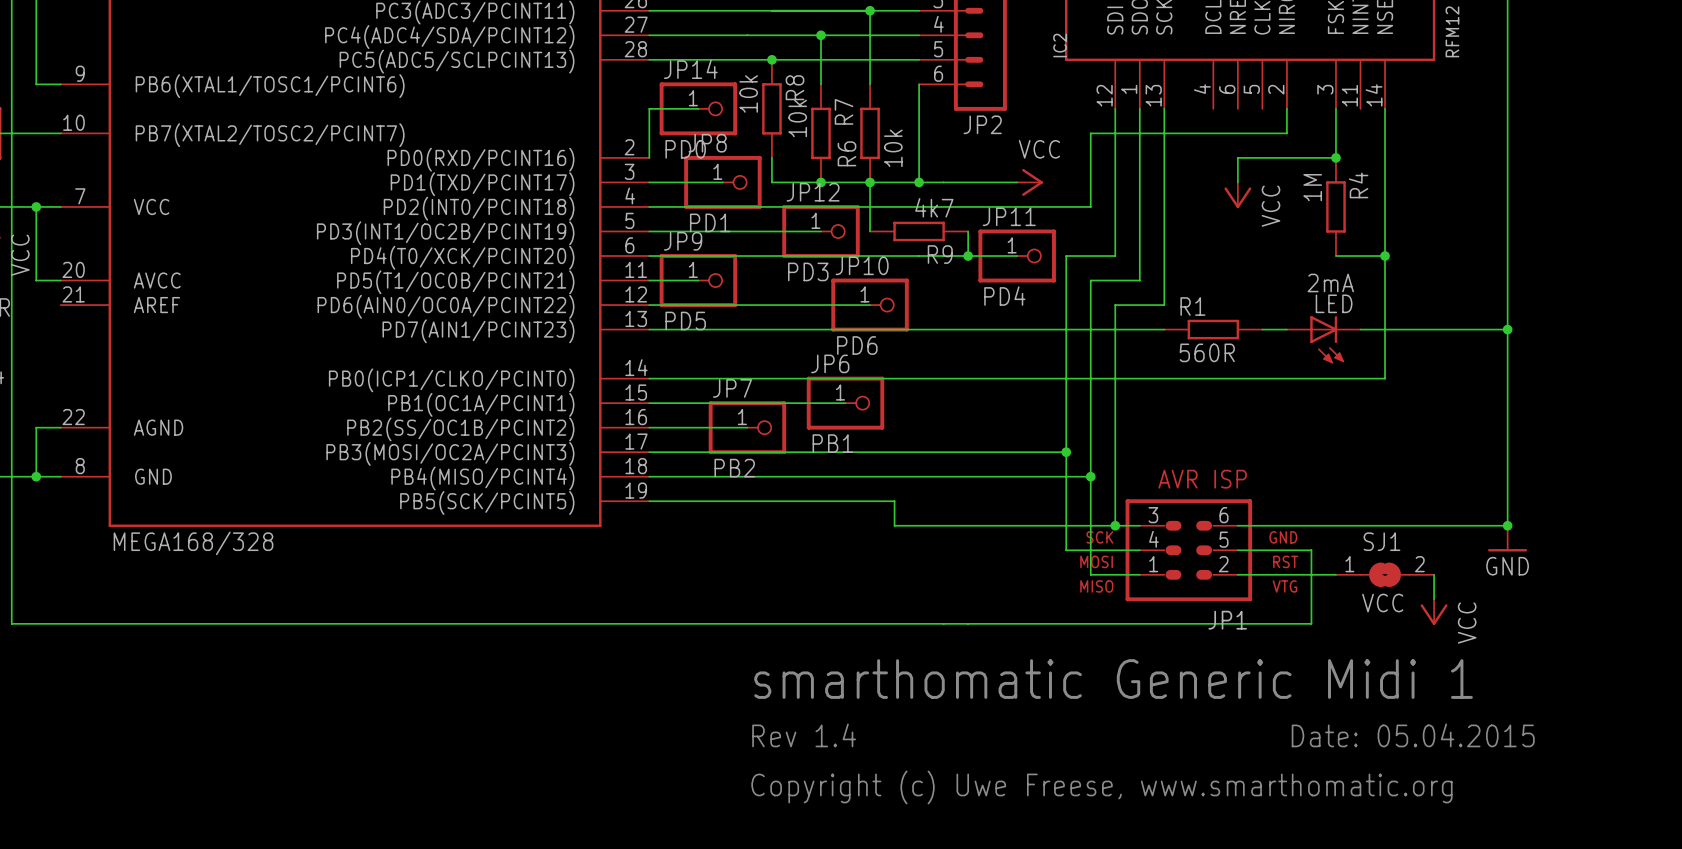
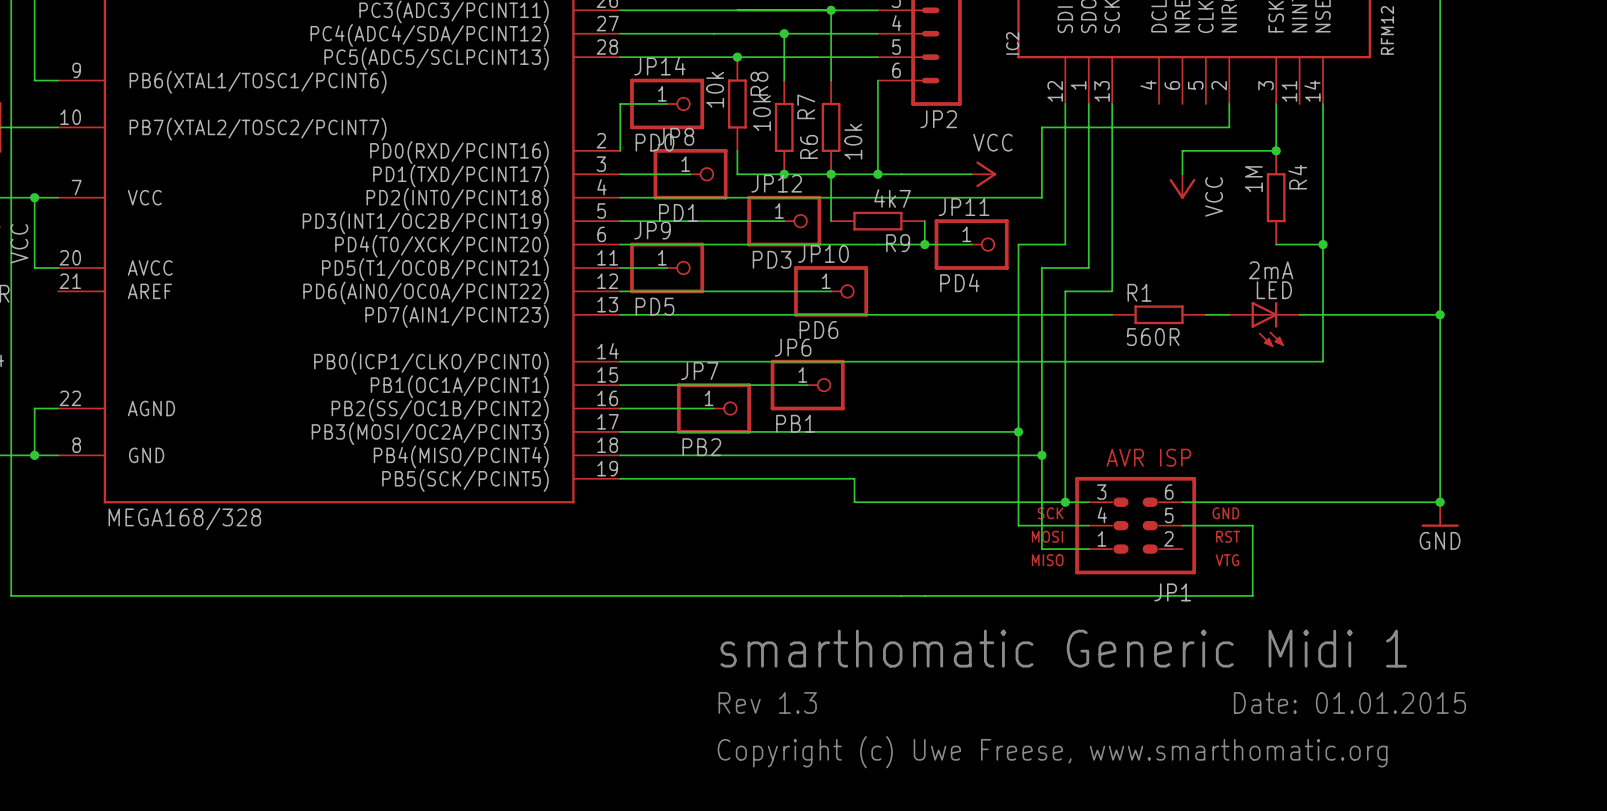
wire: (1237, 574) (1335, 574) -> none
SJ1: VCC (1385, 574) -> none
wire: (1434, 574) (1434, 599) -> none
power symbol: VCC (1434, 612) -> none
text: Rev 1.4 (804, 735) -> Rev 1.3 (767, 702)
text: Date: 05.04.2015 (1413, 735) -> Date: 01.01.2015 (1349, 702)

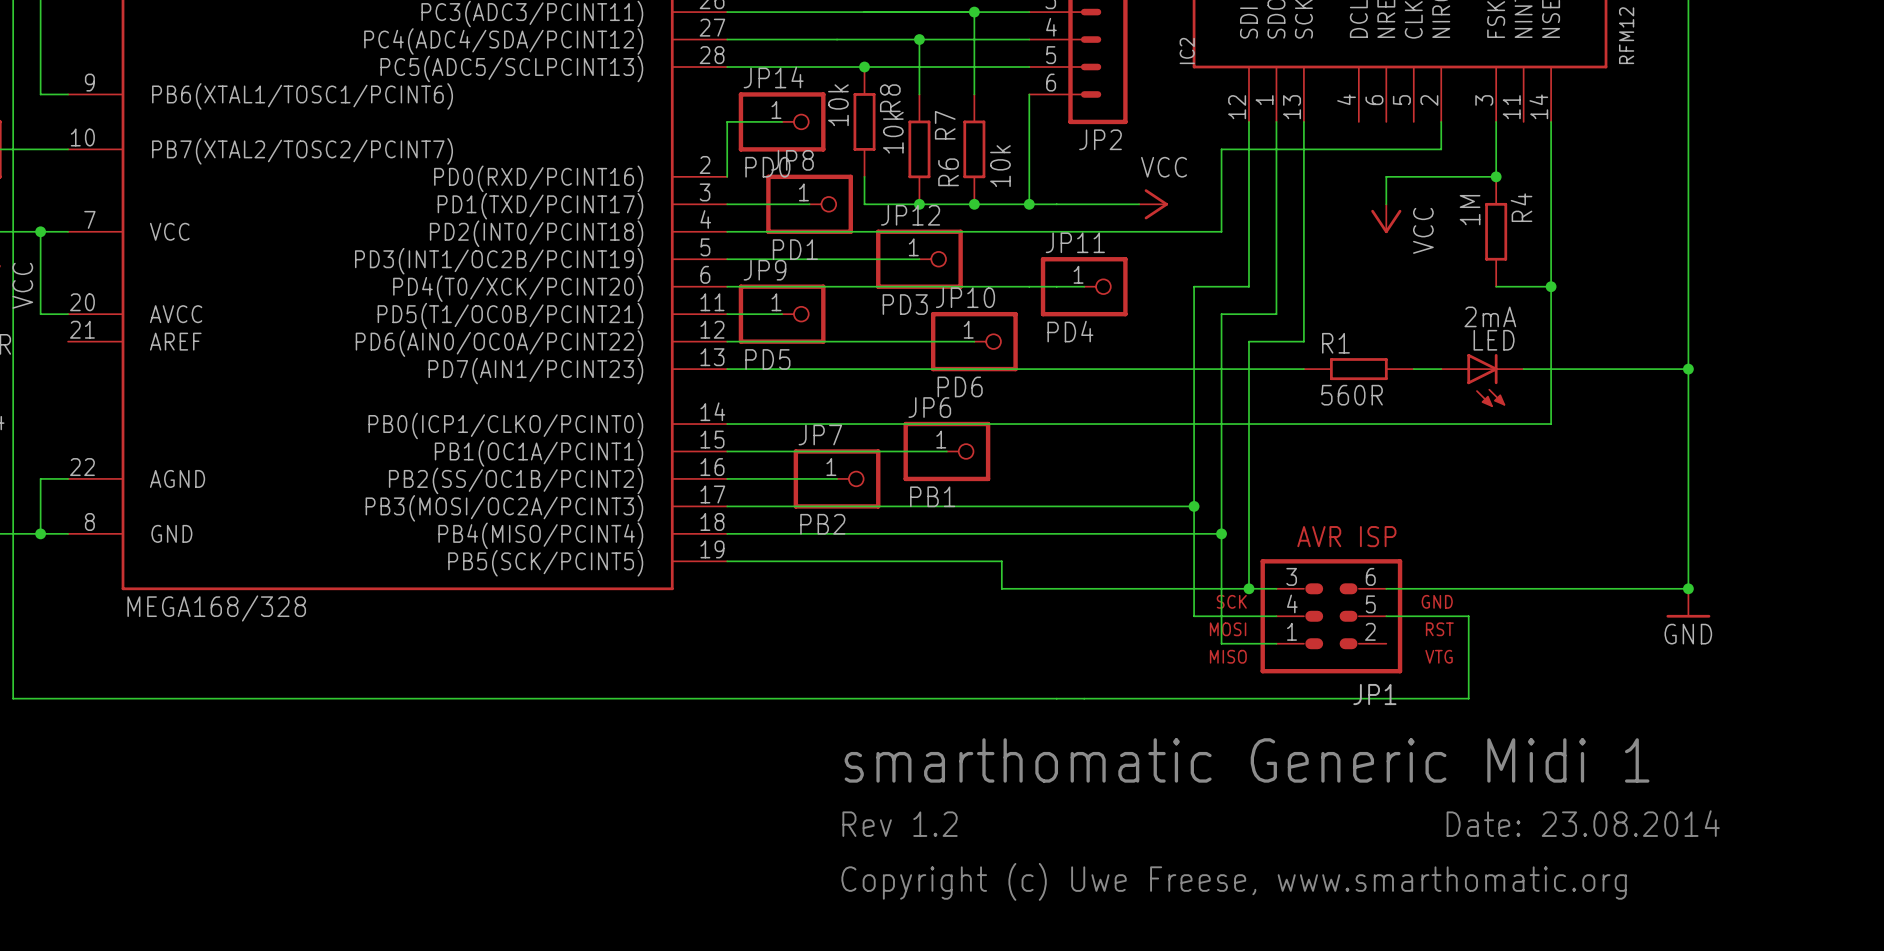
wire: (831, 174) (831, 221) -> none
R9: 4k7 (877, 221) -> none
wire: (924, 221) (924, 244) (971, 244) -> none
junction: (924, 244) -> none
JP11 position: (971, 244) -> (1084, 286)
text: Rev 1.3 (767, 702) -> Rev 1.2 (900, 824)
text: Date: 01.01.2015 (1349, 702) -> Date: 23.08.2014 (1583, 823)

